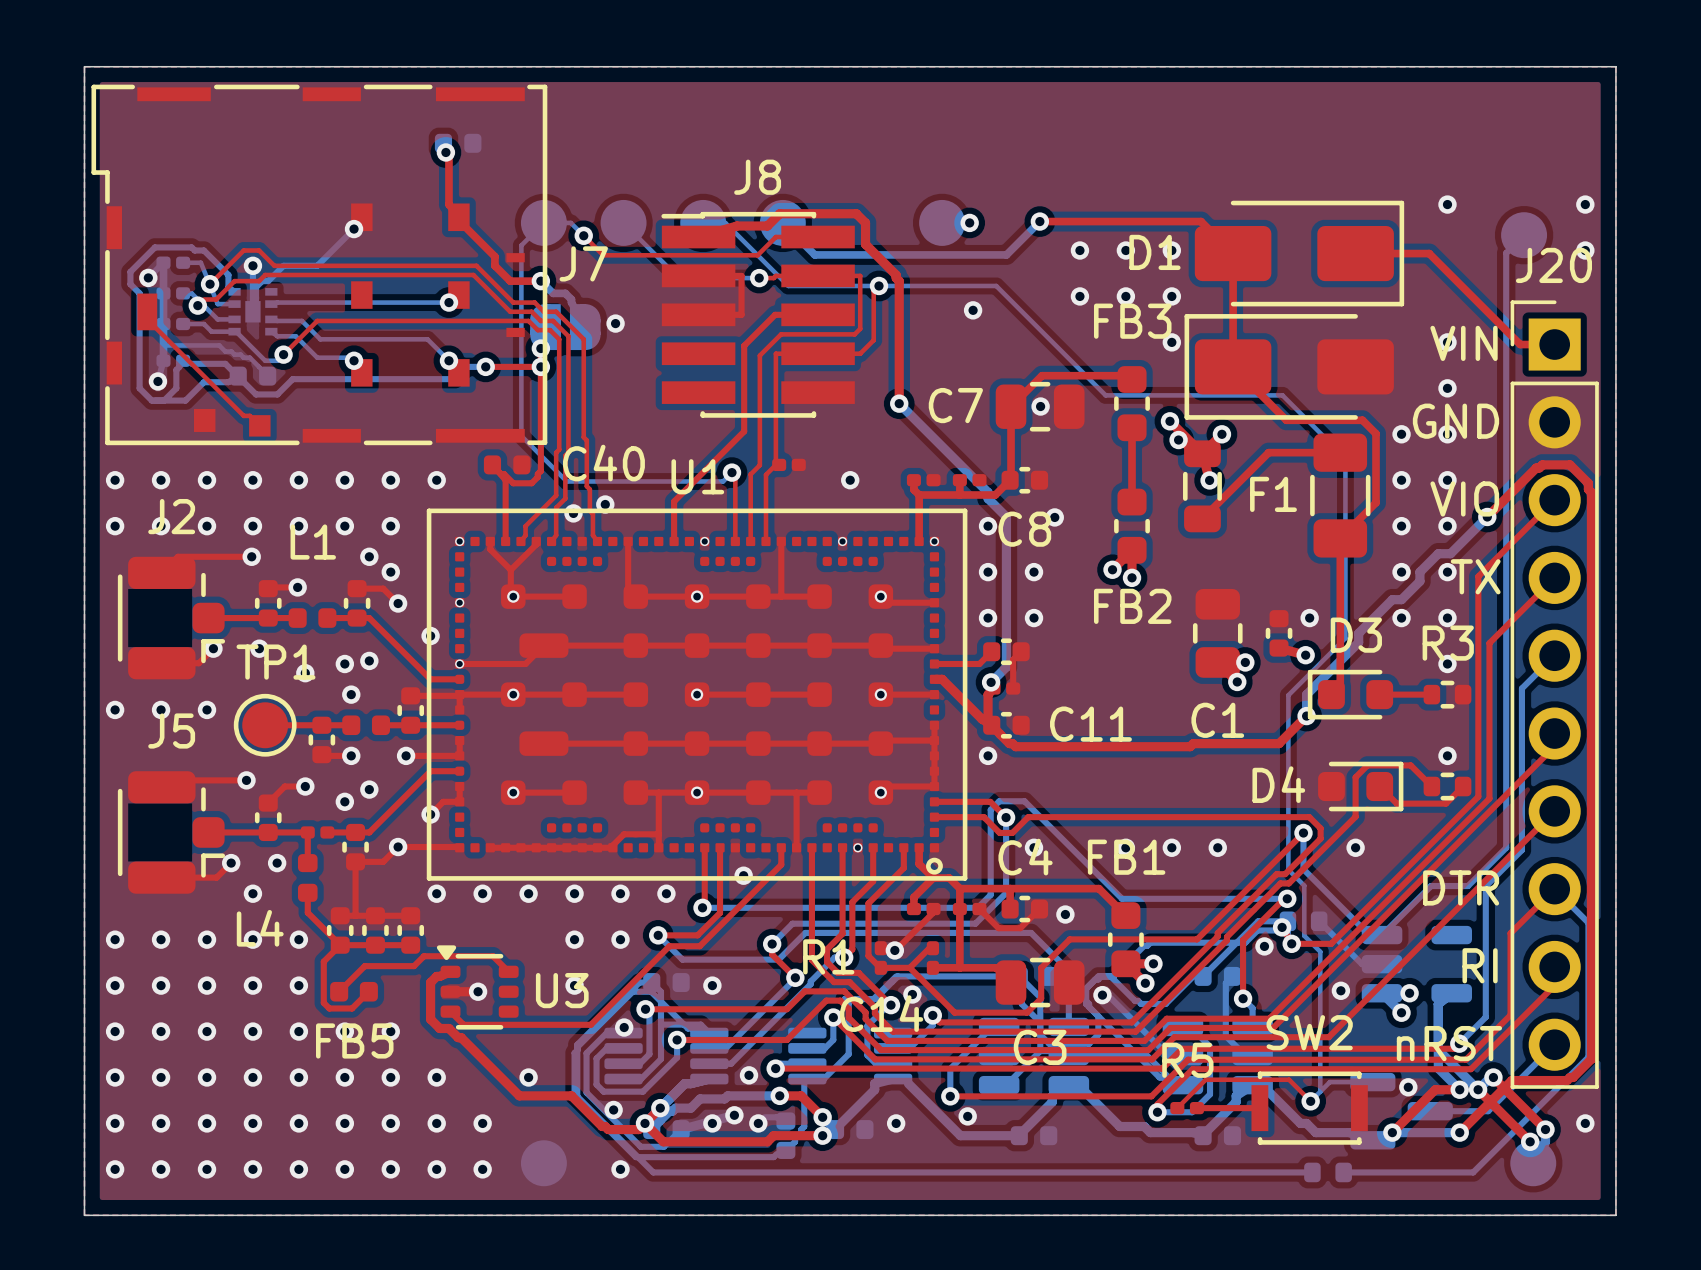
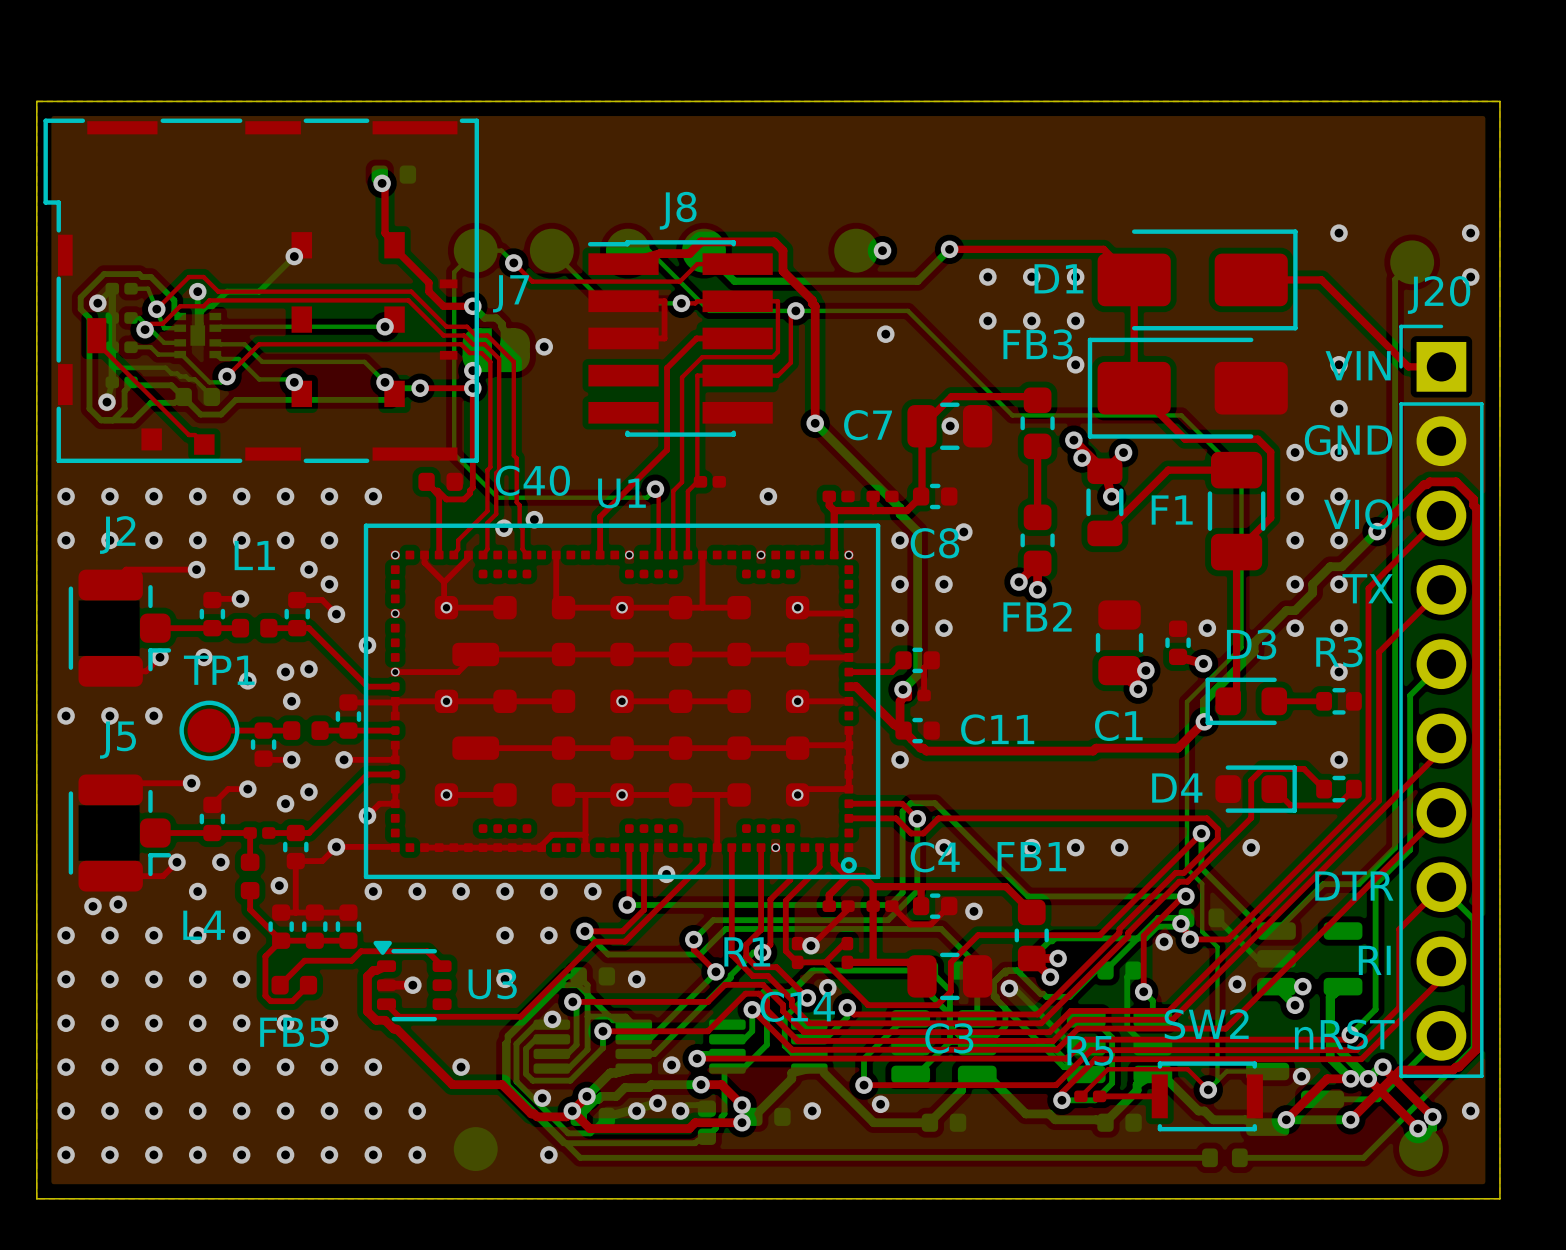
via: none -> (279, 885)
via: none -> (118, 904)
via: none -> (92, 906)

